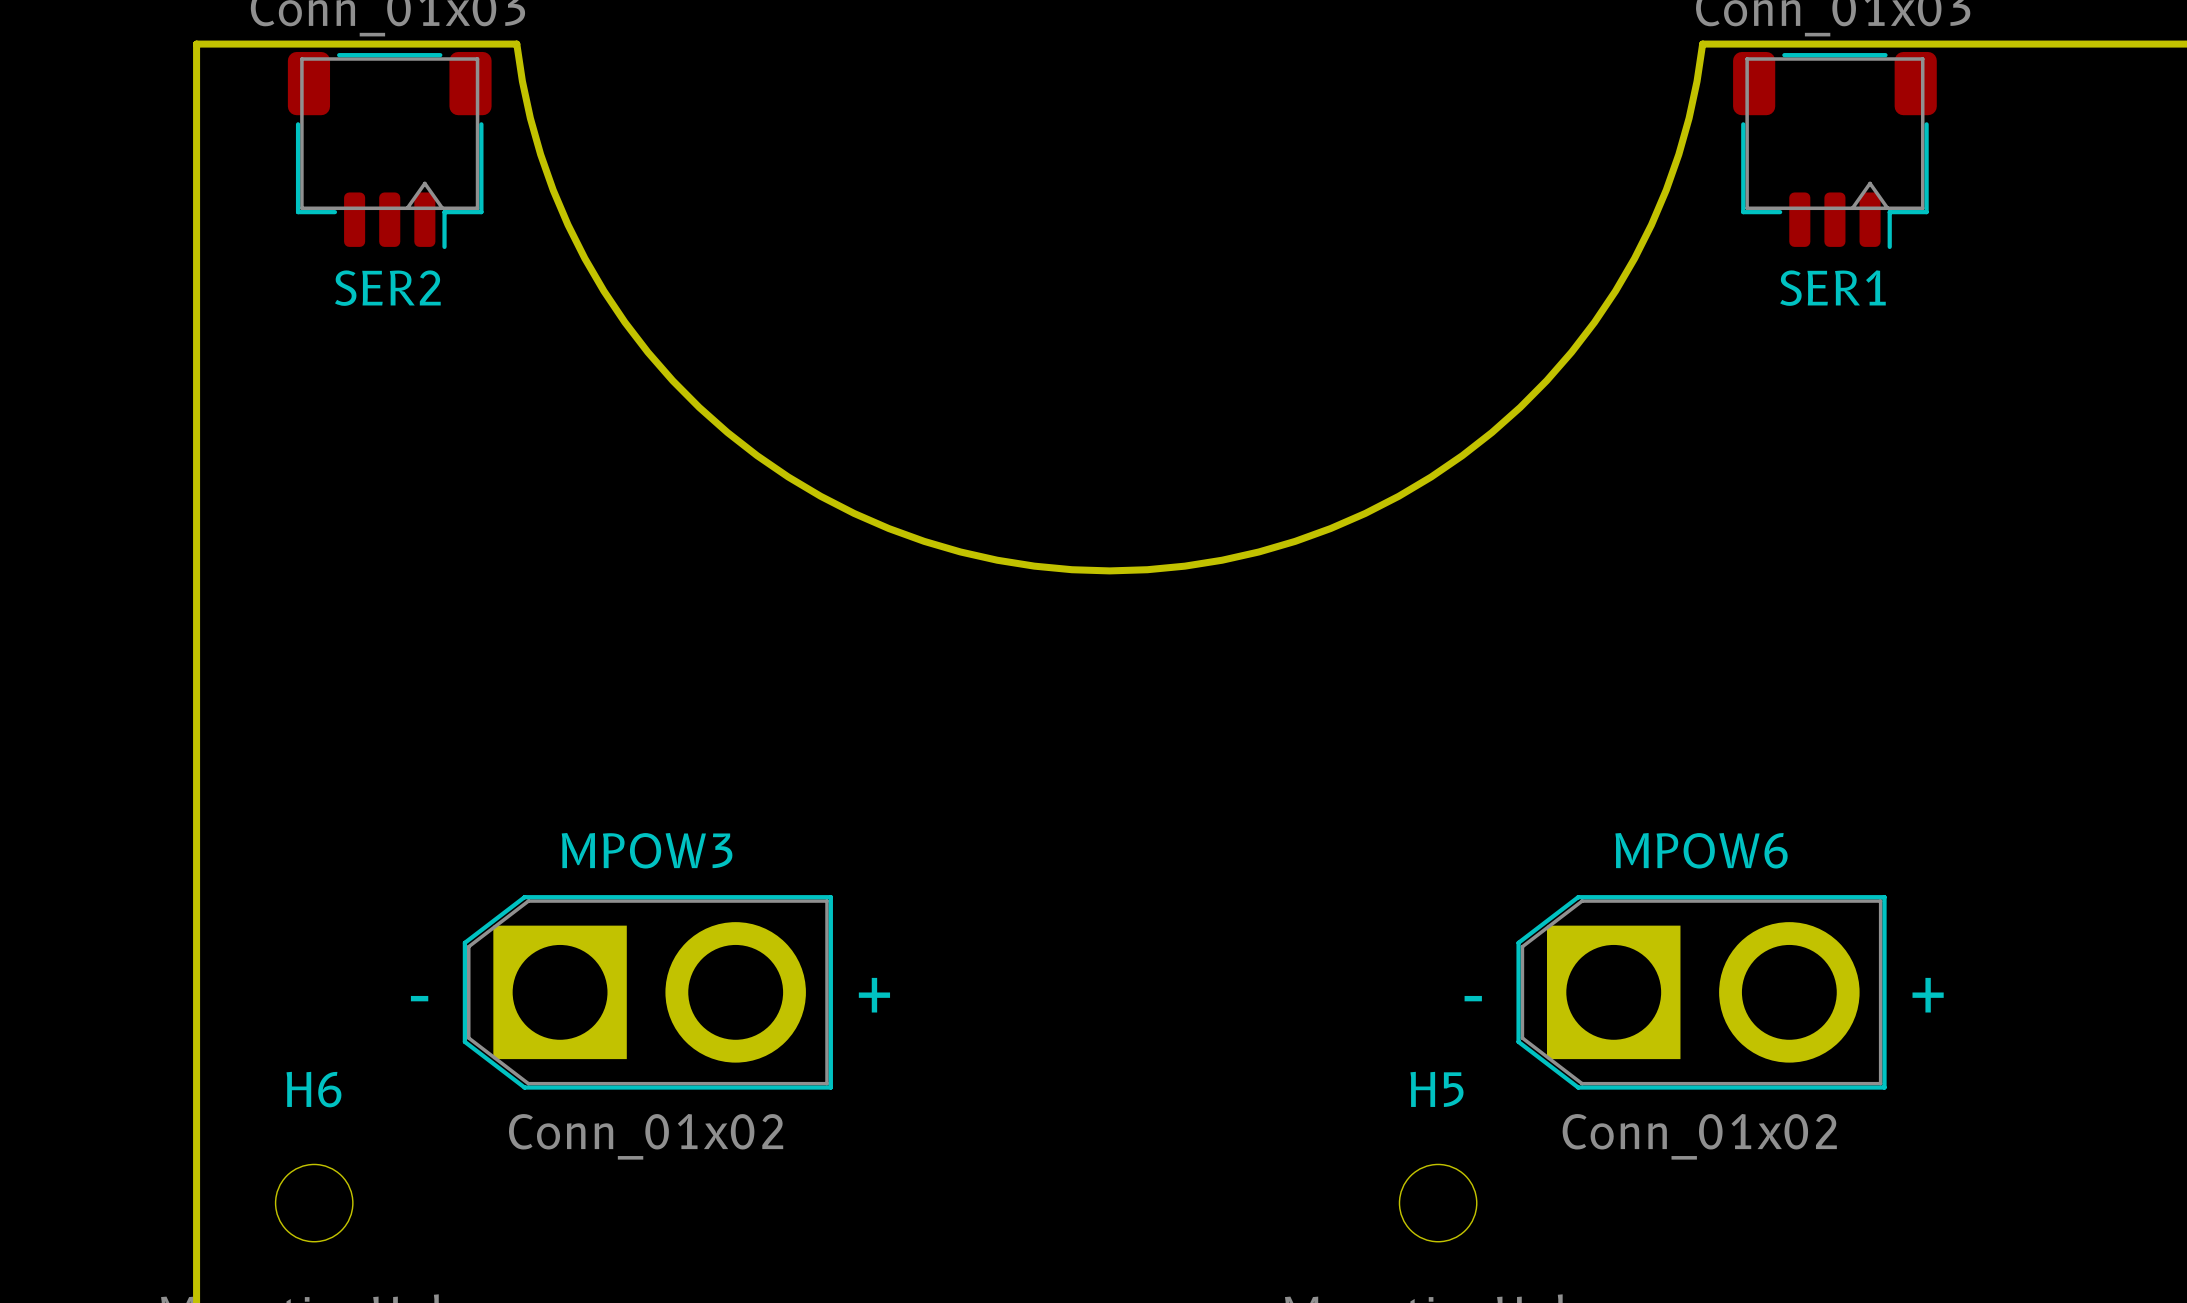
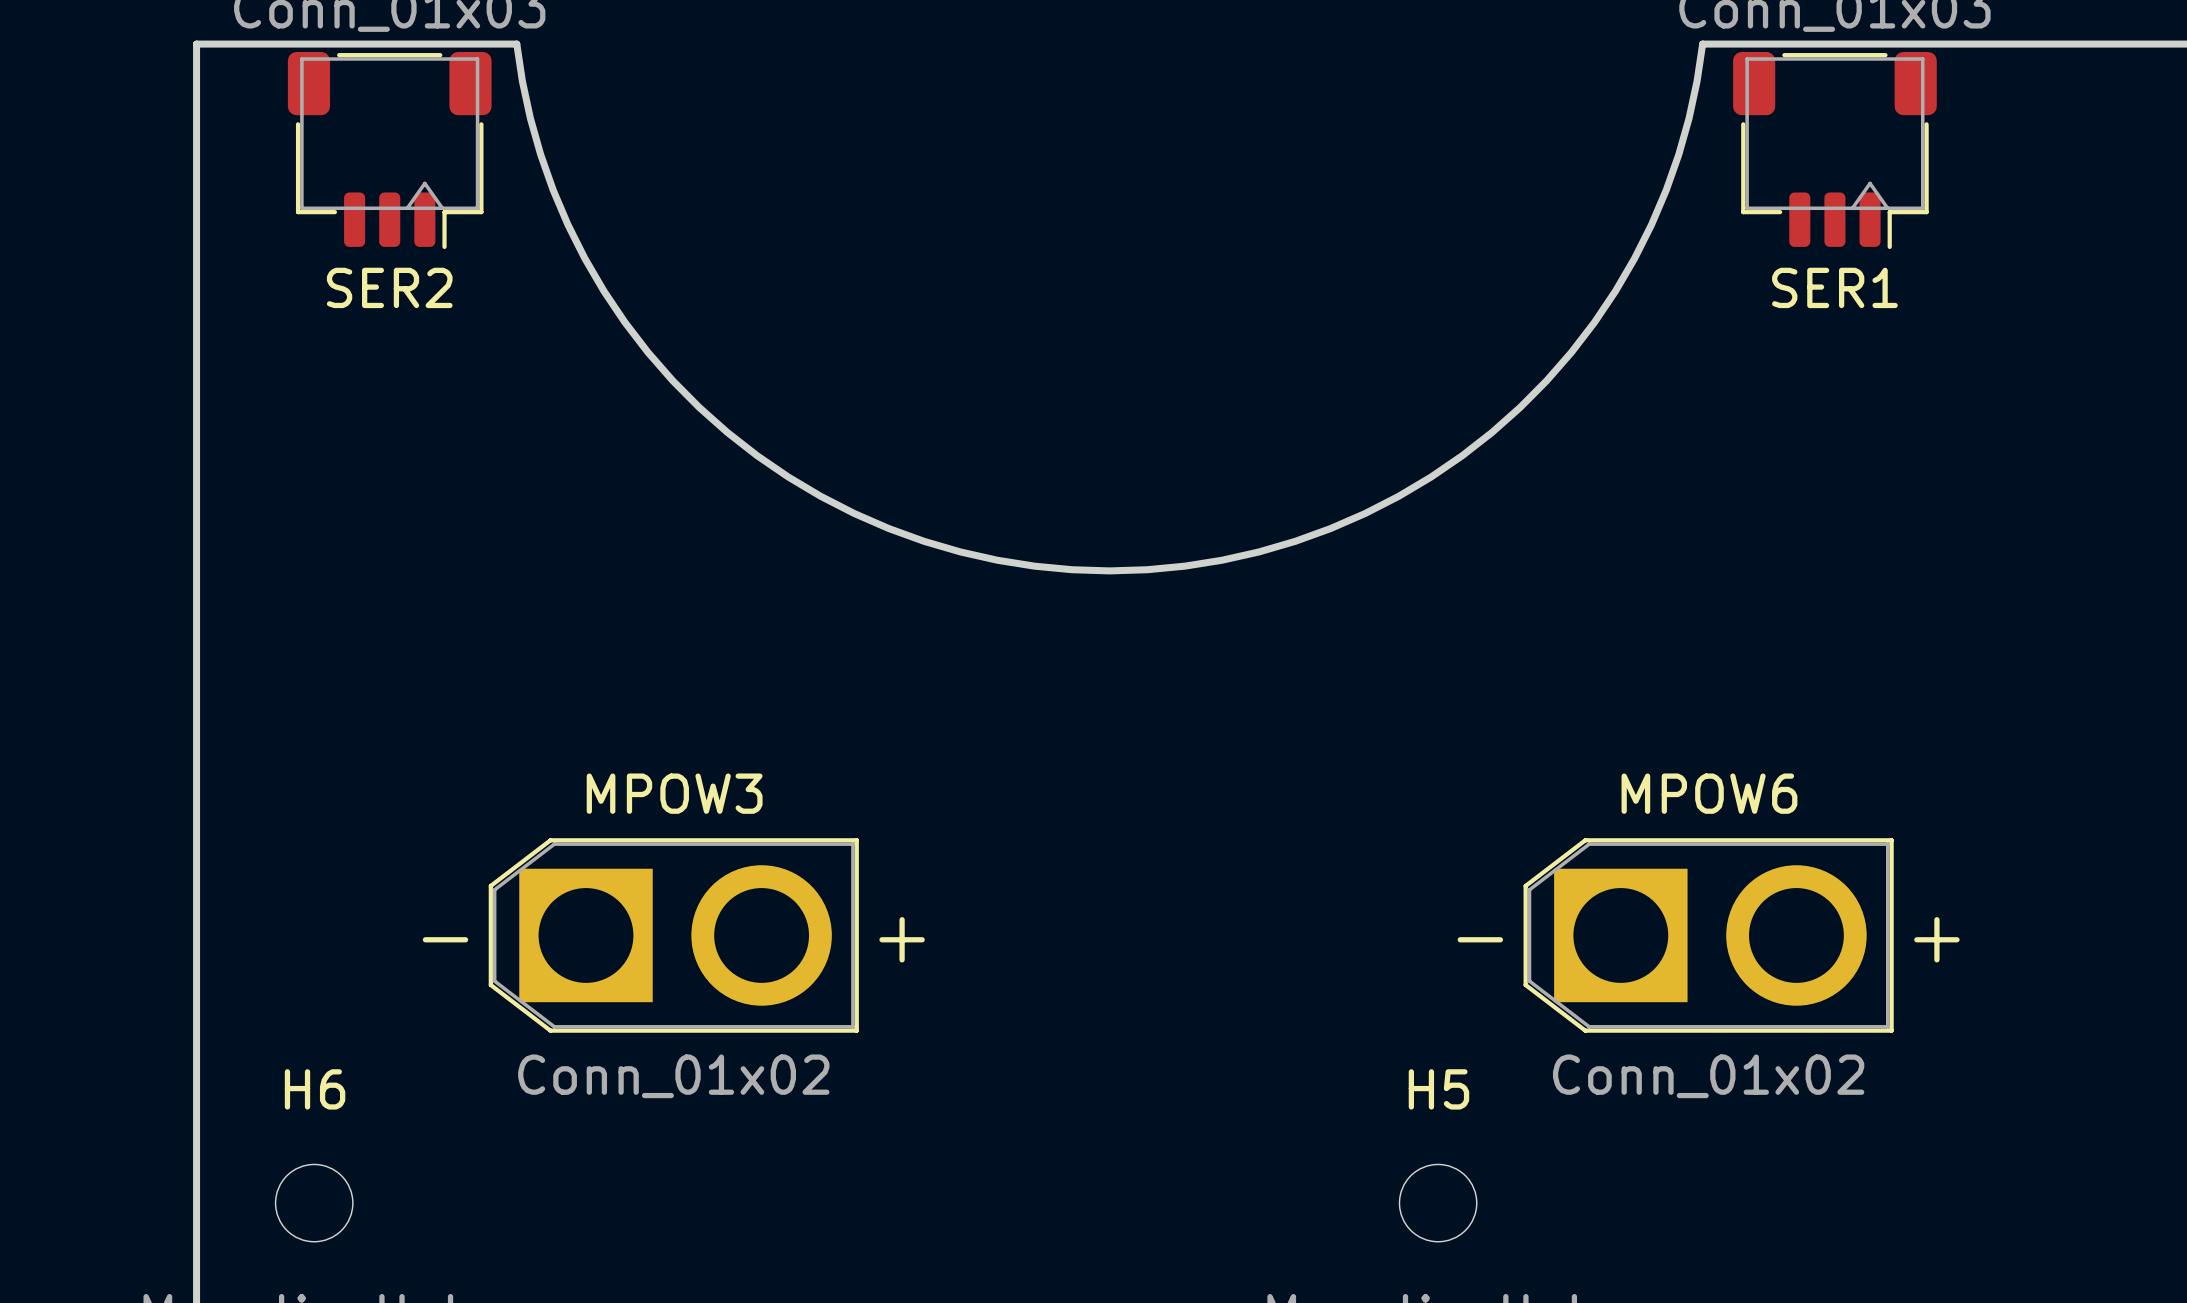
MPOW3 position: (647, 992) -> (673, 935)
MPOW6 position: (1701, 992) -> (1708, 935)

